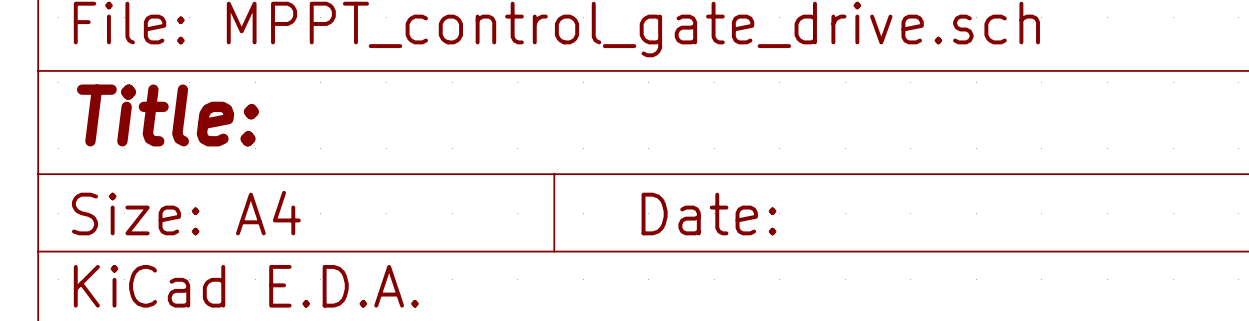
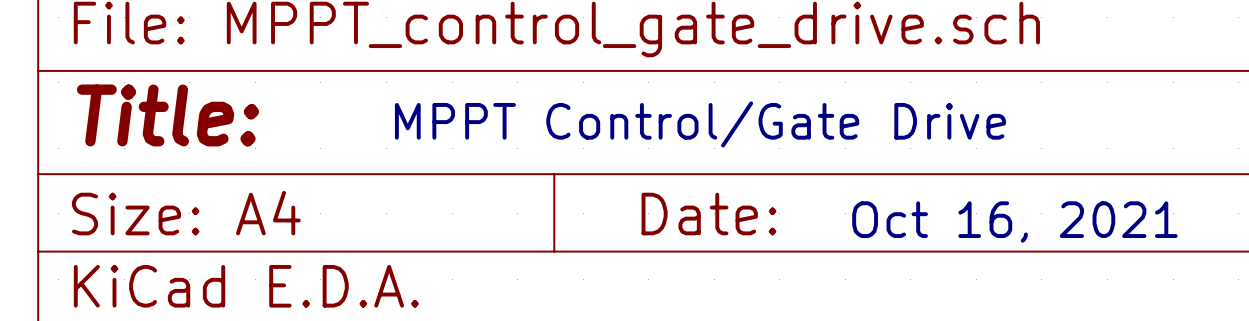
text: none -> MPPT Control/Gate Drive (700, 124)
text: none -> Oct 16, 2021 (1014, 221)

